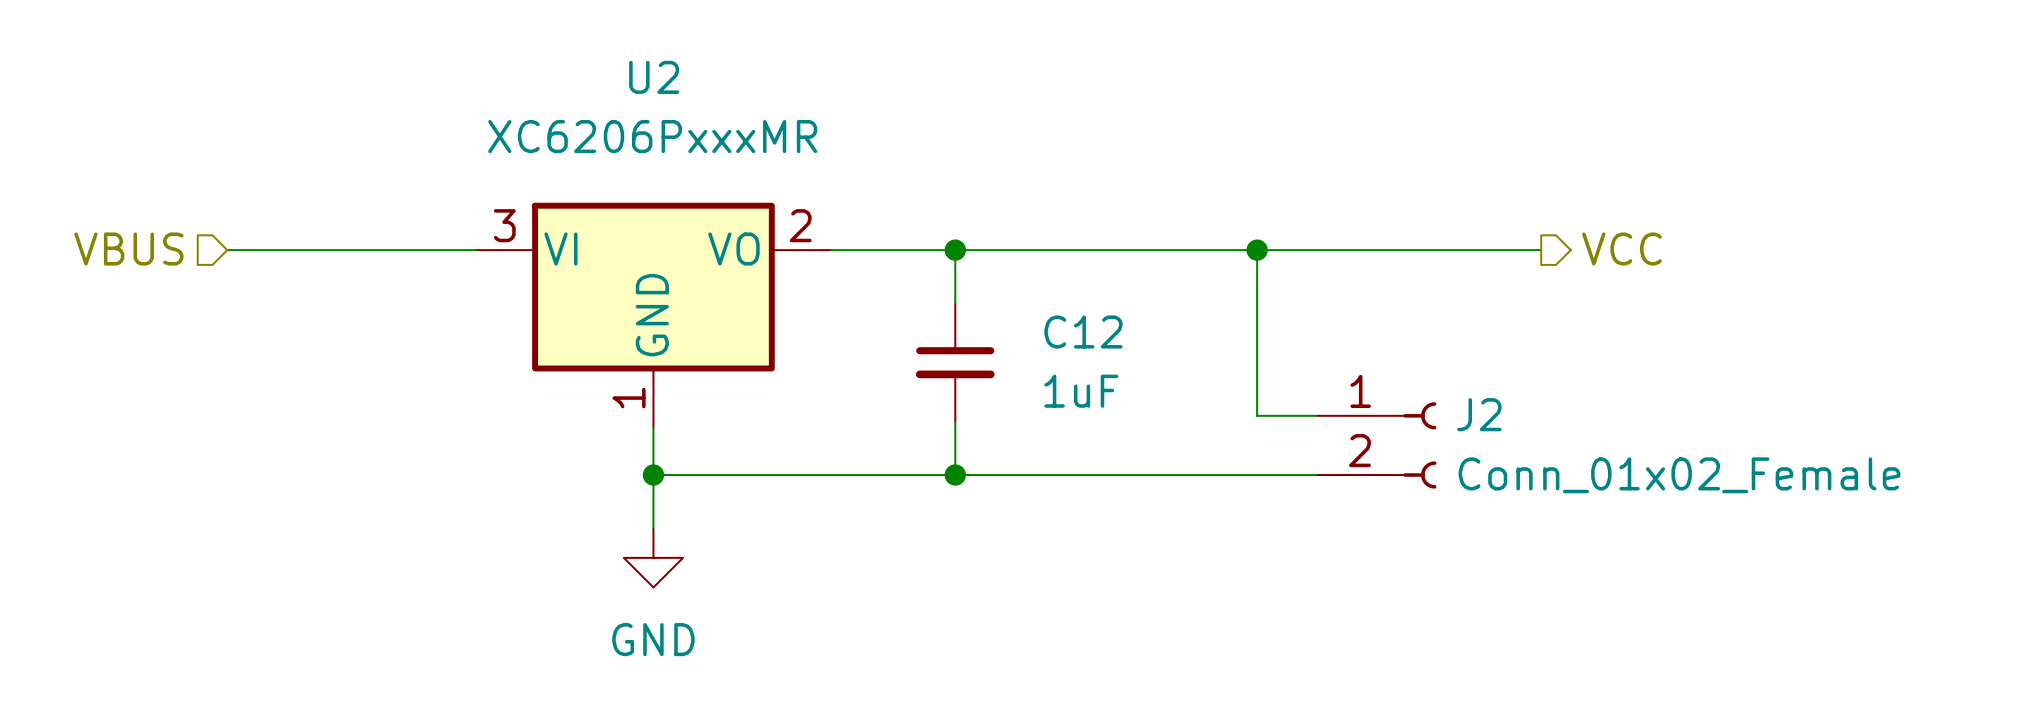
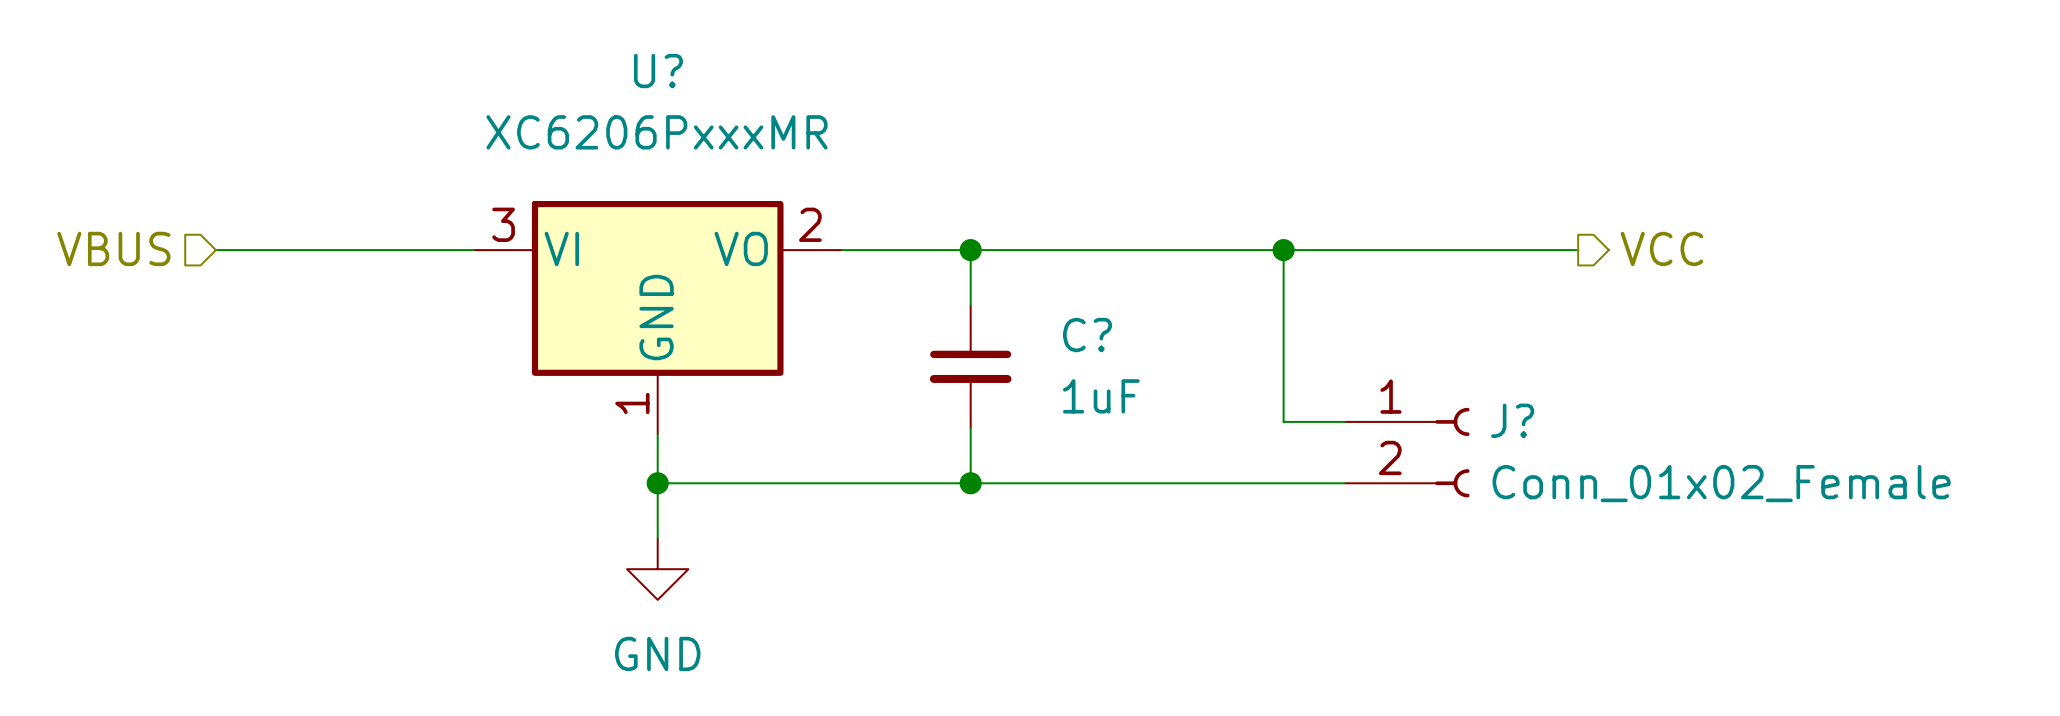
U2 name: U2 (654, 77) -> U? (658, 70)
C12 name: C12 (1083, 332) -> C? (1087, 335)
J2 name: J2 (1479, 414) -> J? (1512, 420)

